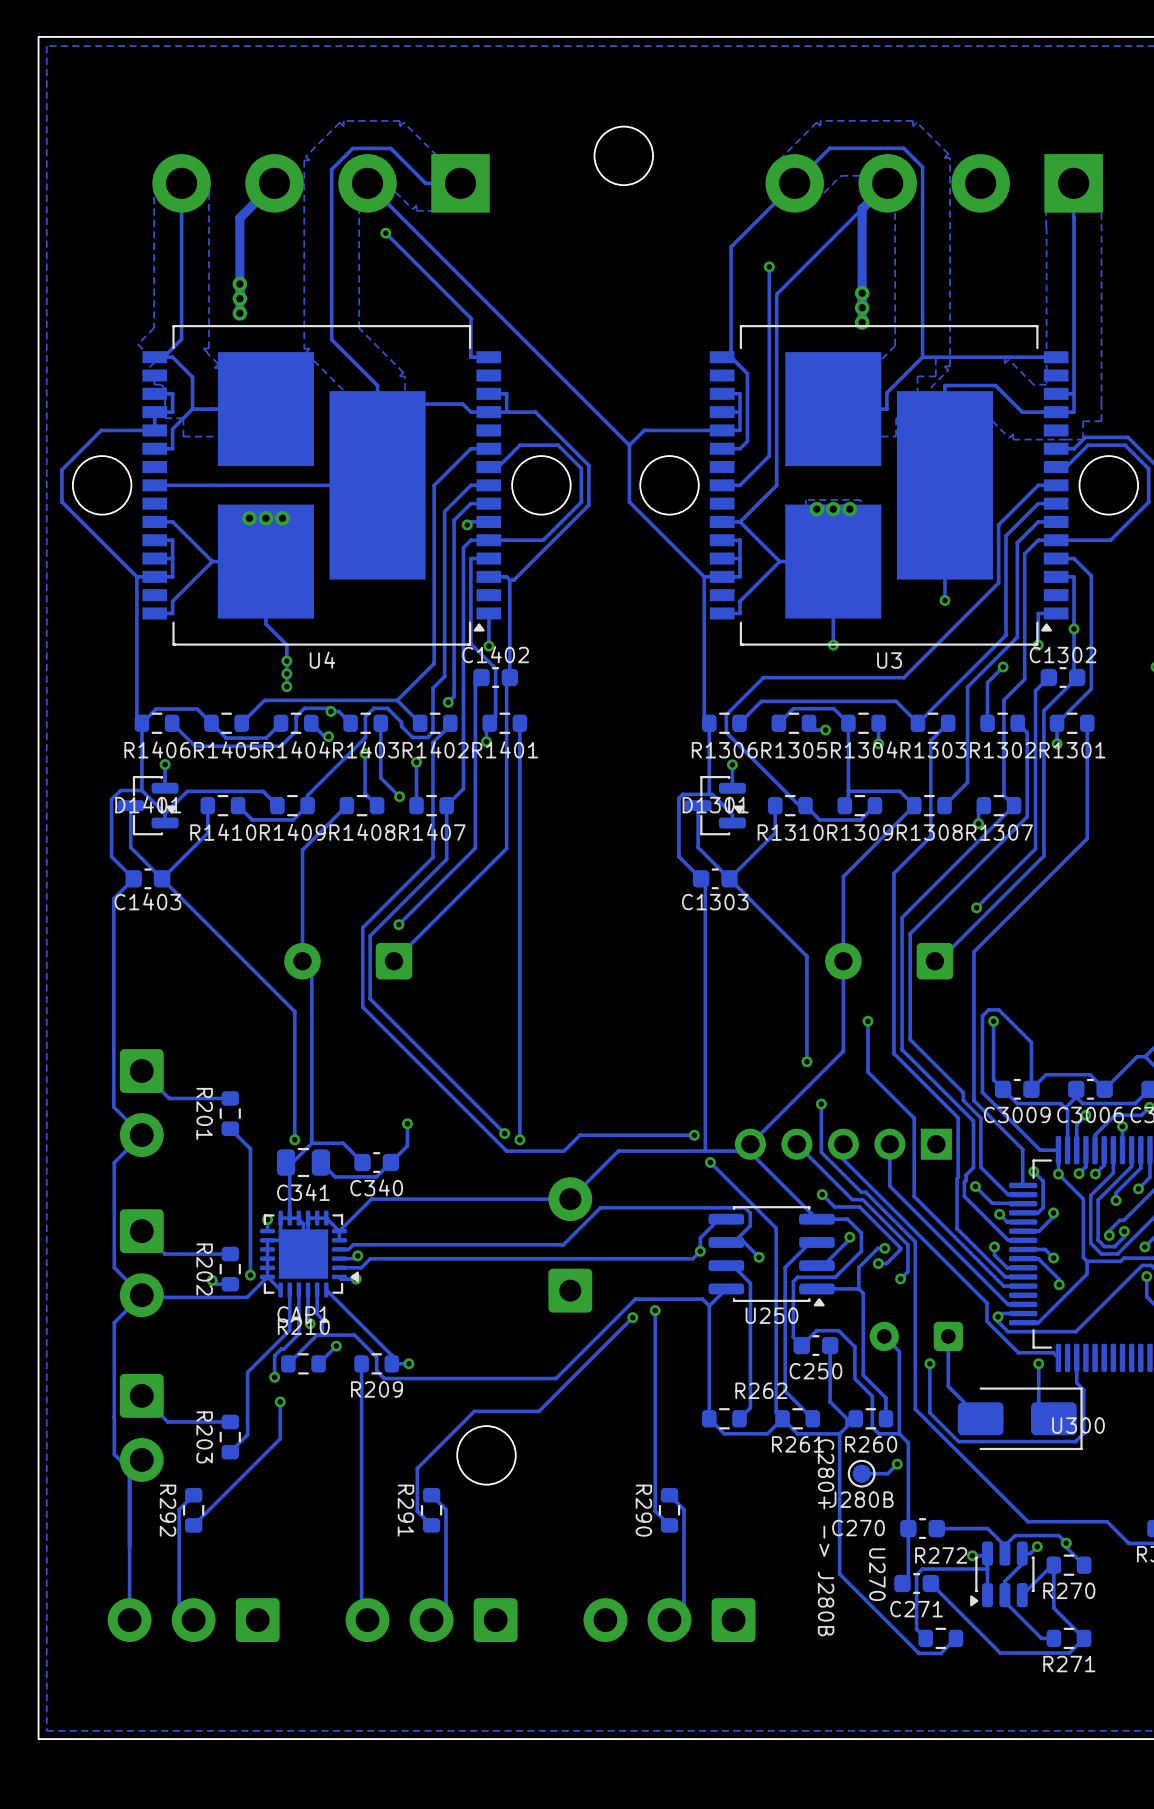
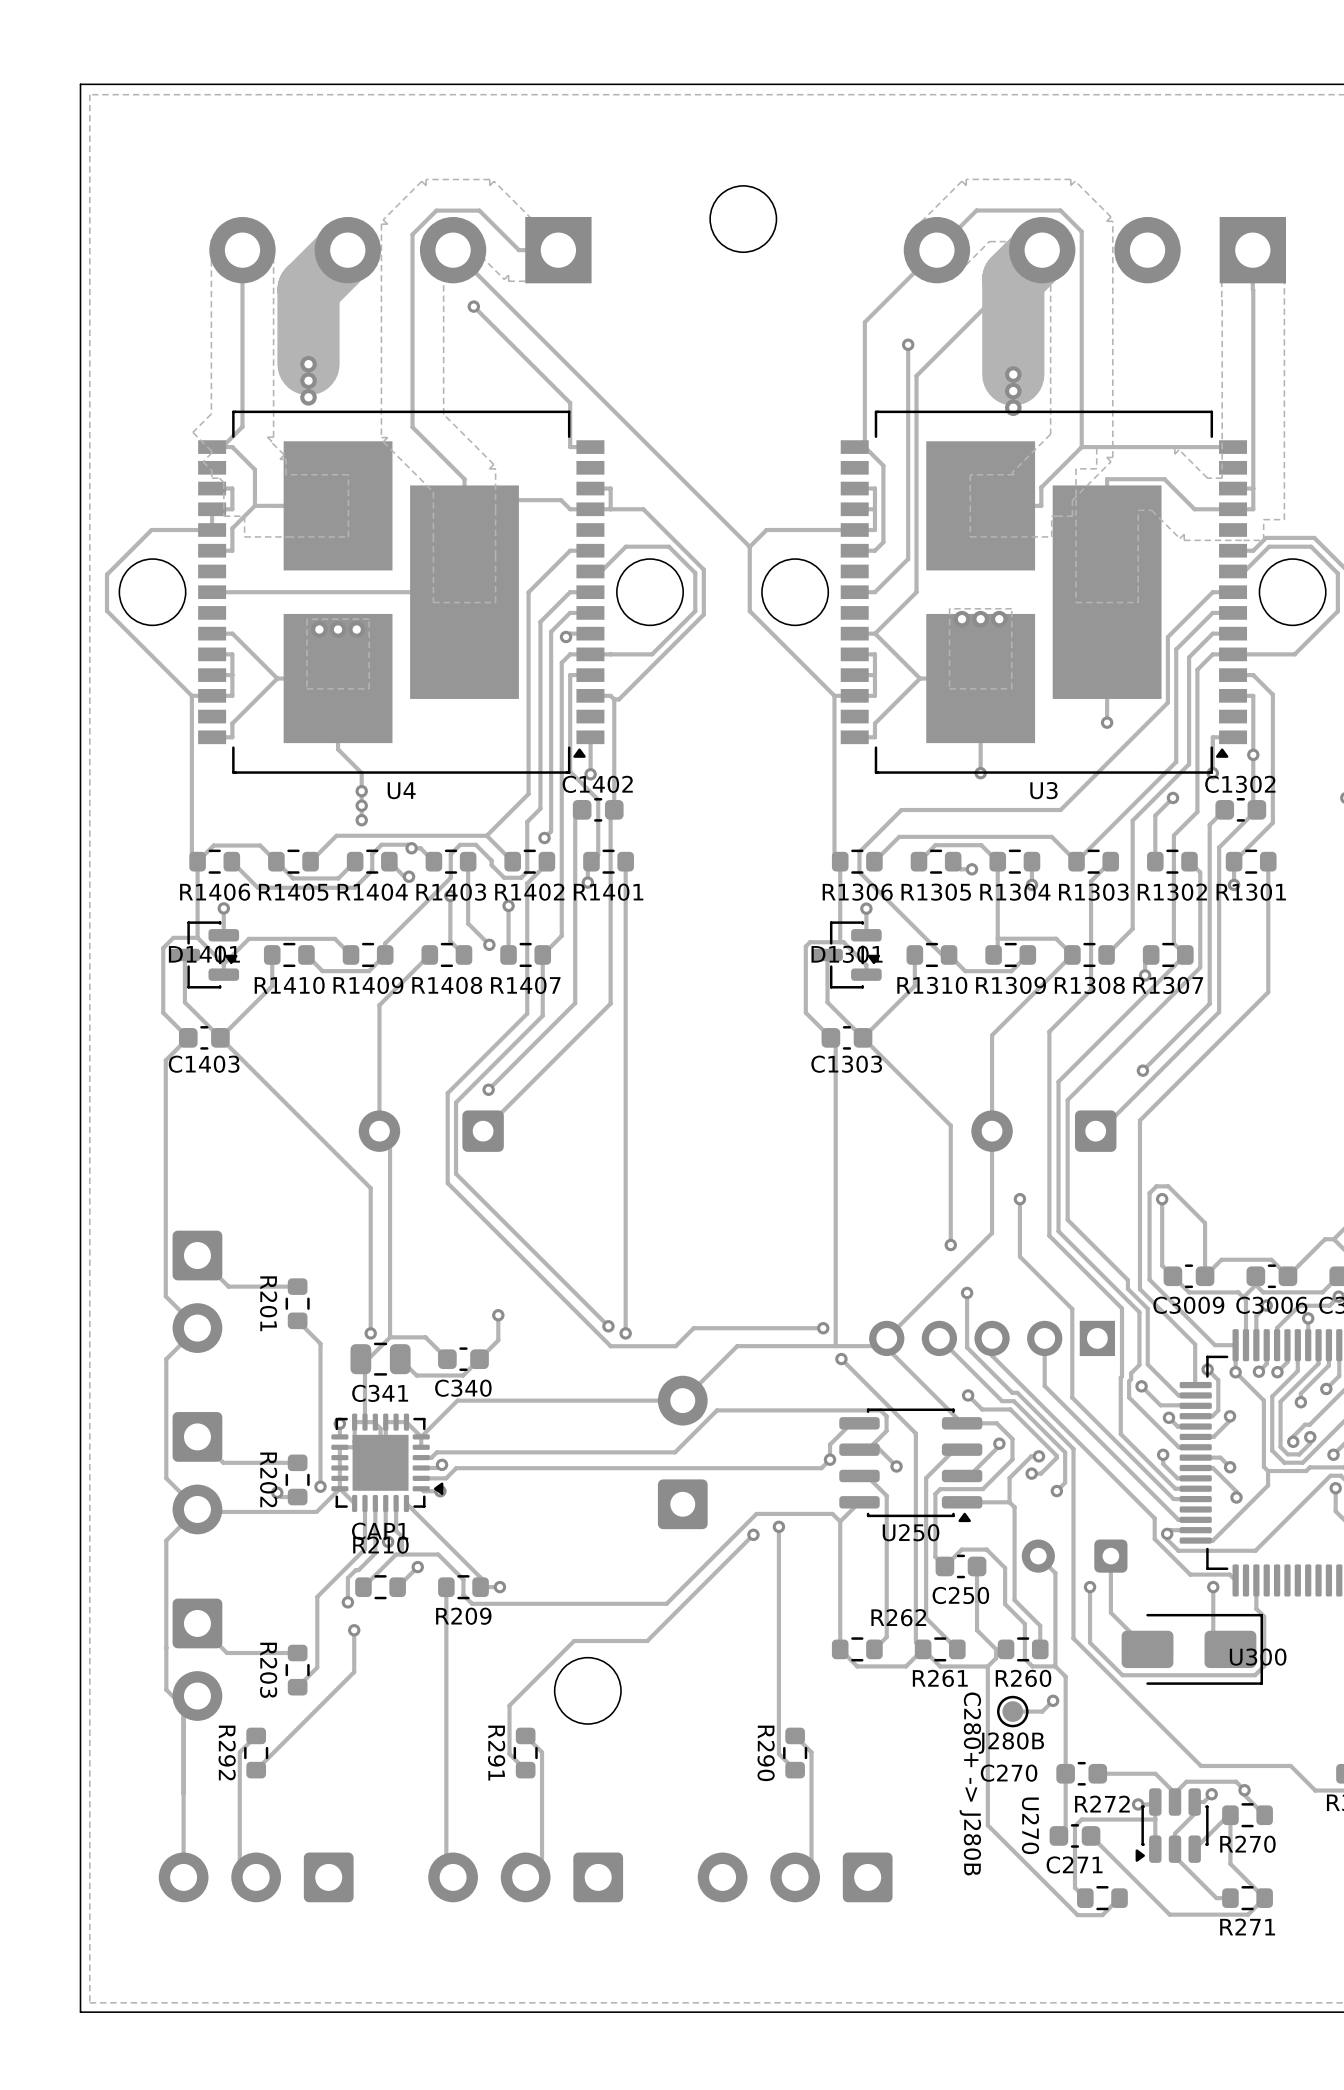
track width: thin (274, 183) (239, 218) (239, 284) -> thick (347, 250) (308, 289) (308, 364)
track width: thin (887, 183) (862, 208) (862, 293) -> thick (1042, 250) (1013, 279) (1013, 374)

